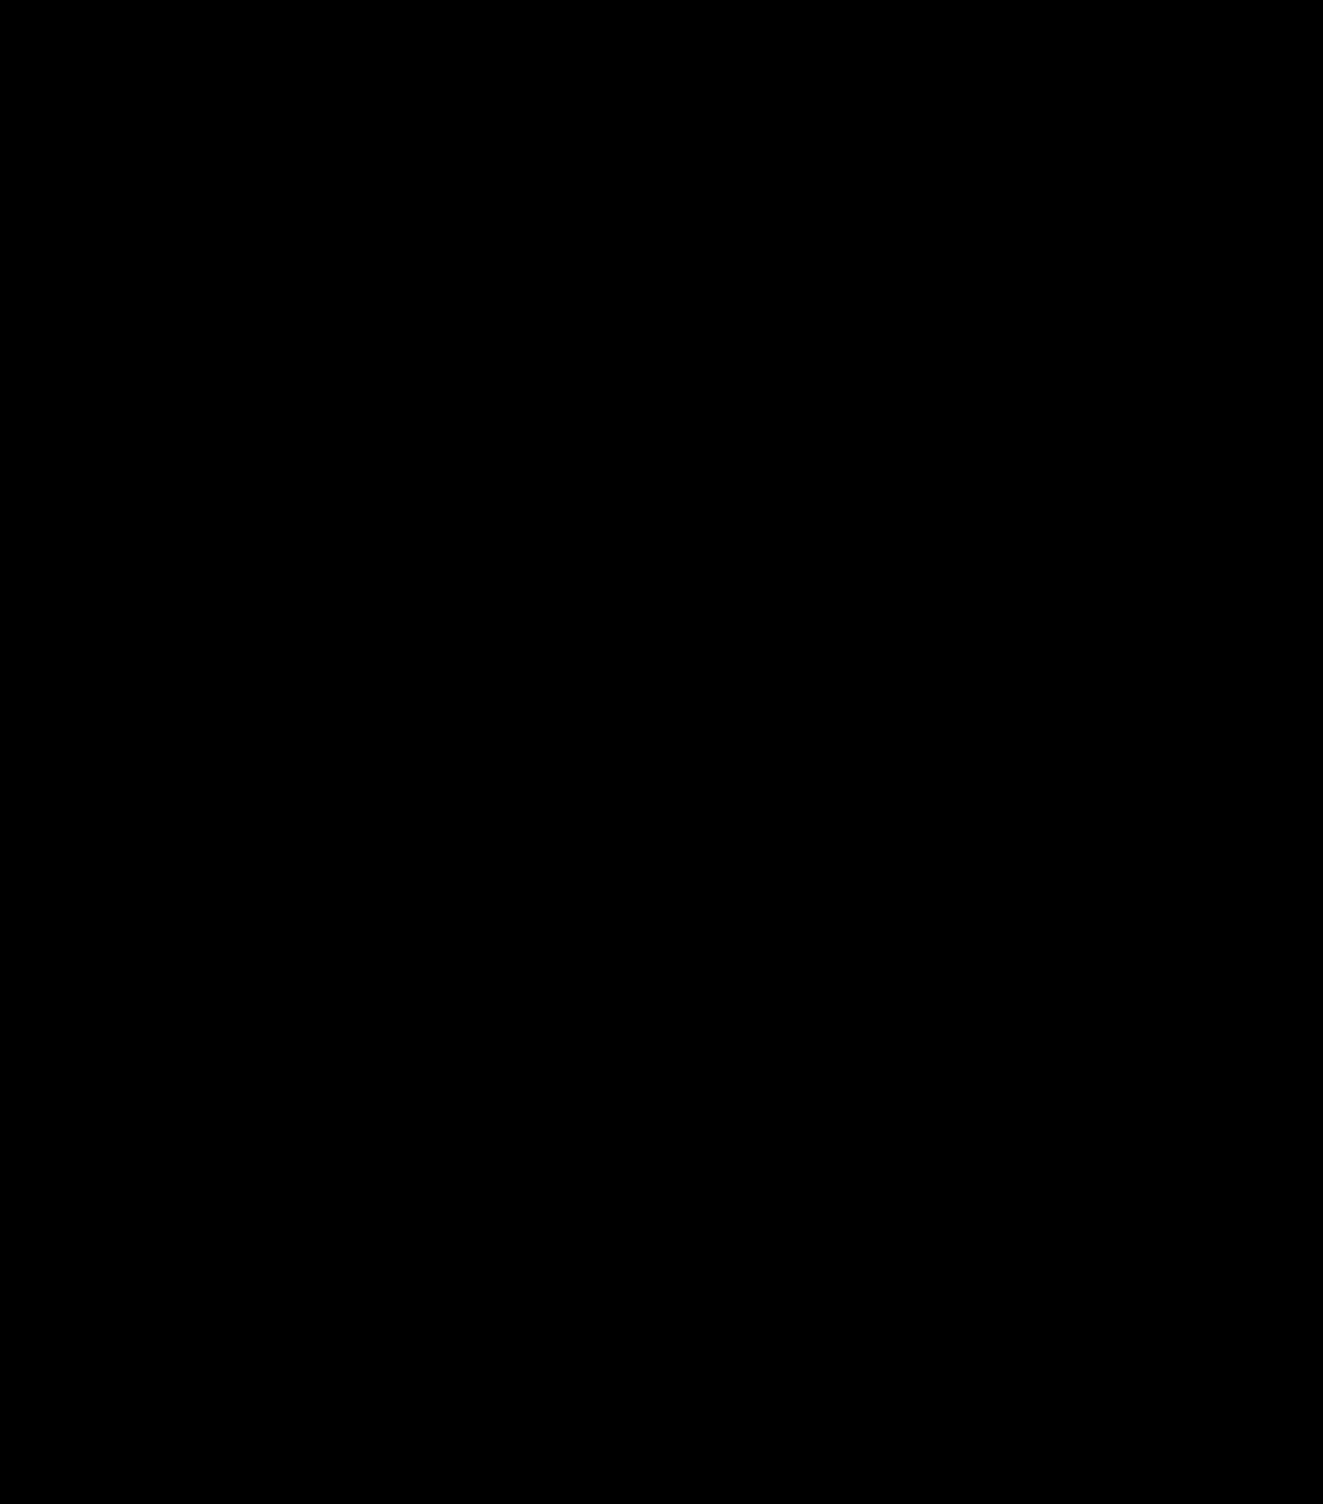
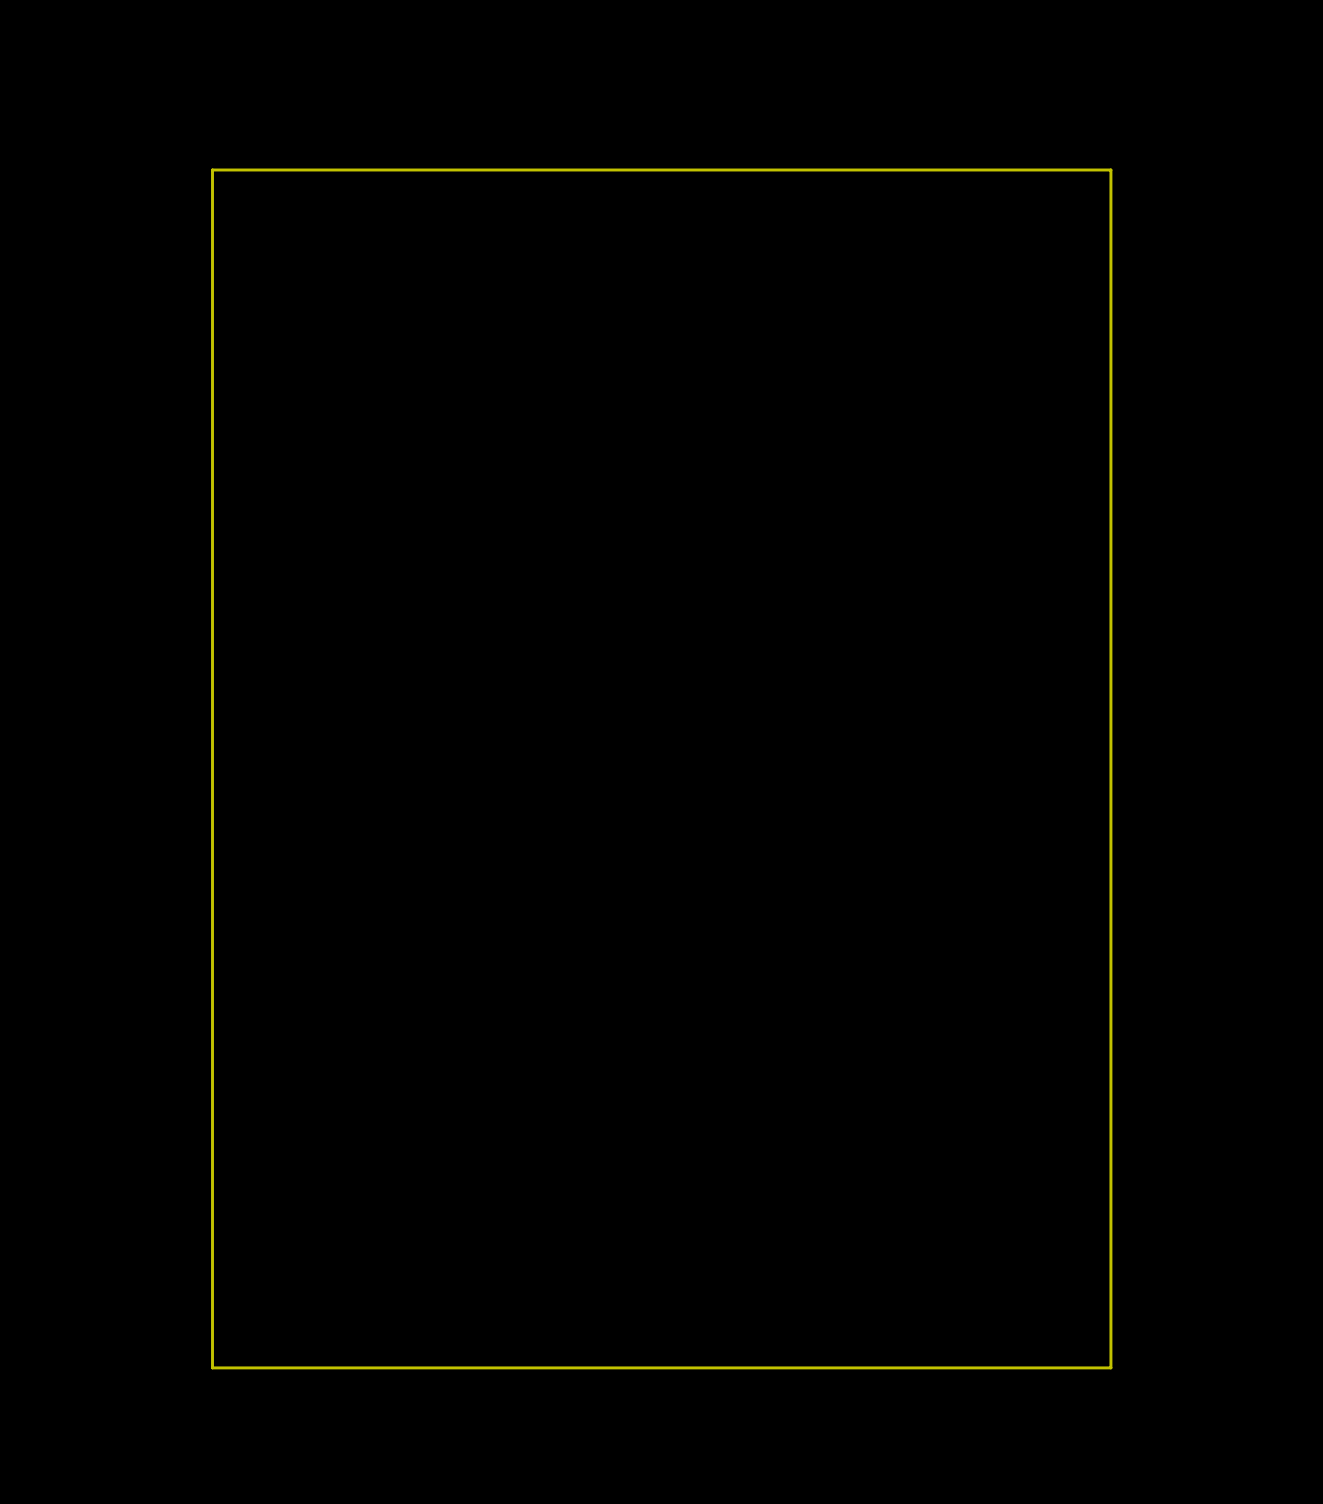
board edge: none -> (212, 170) (1110, 170) (1110, 1367) (212, 1367) (212, 170)

